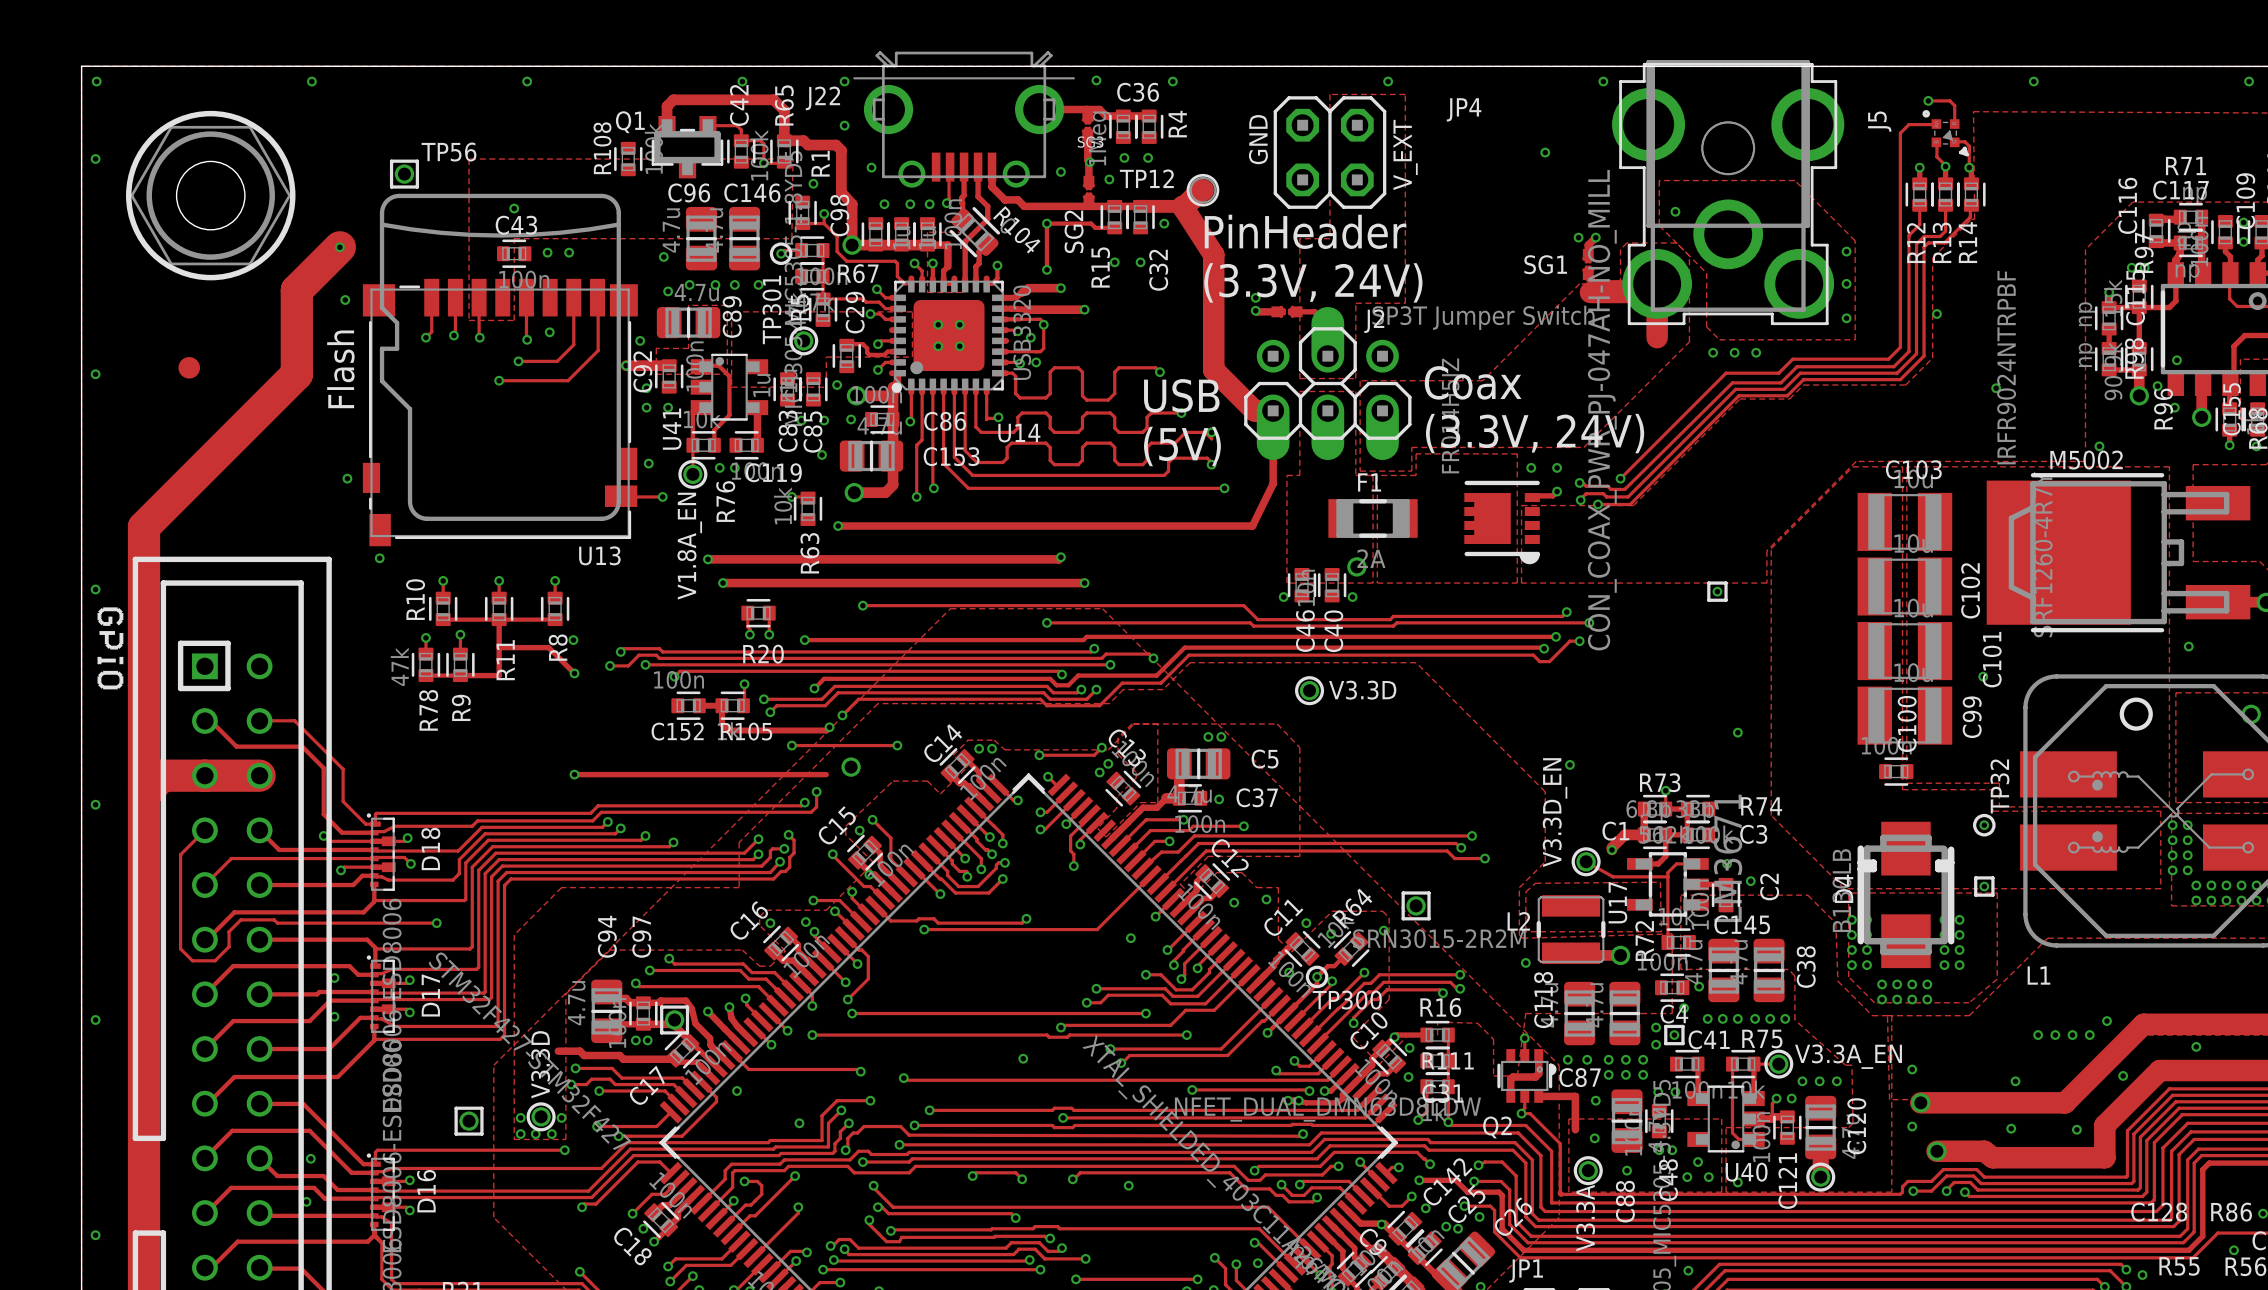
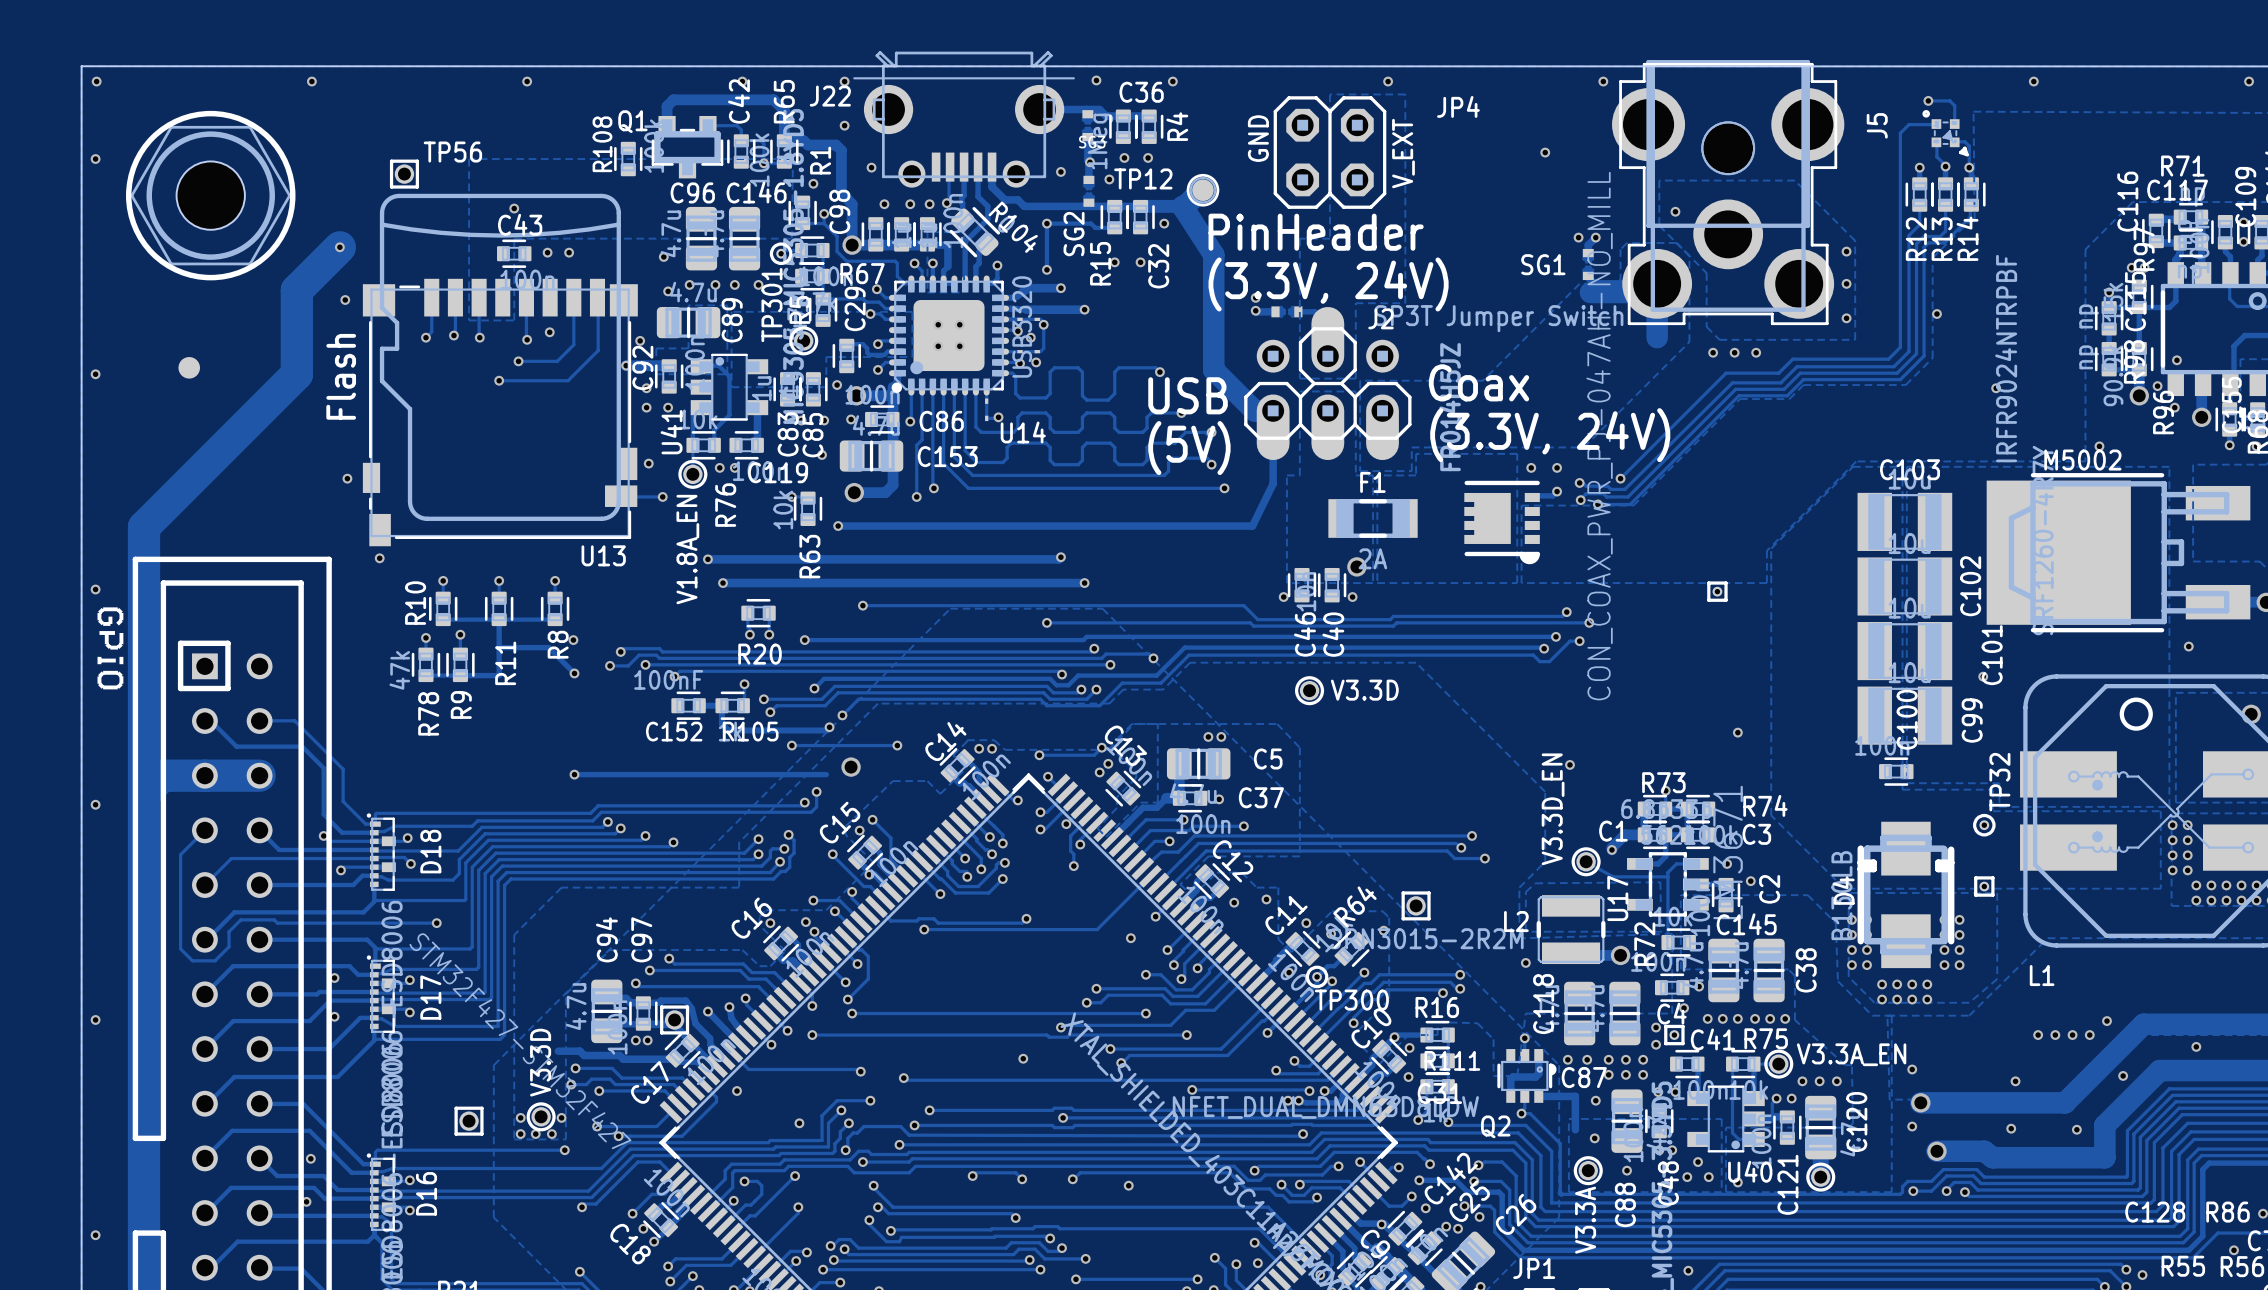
C152 value: 100n (679, 679) -> 100nF (668, 679)

